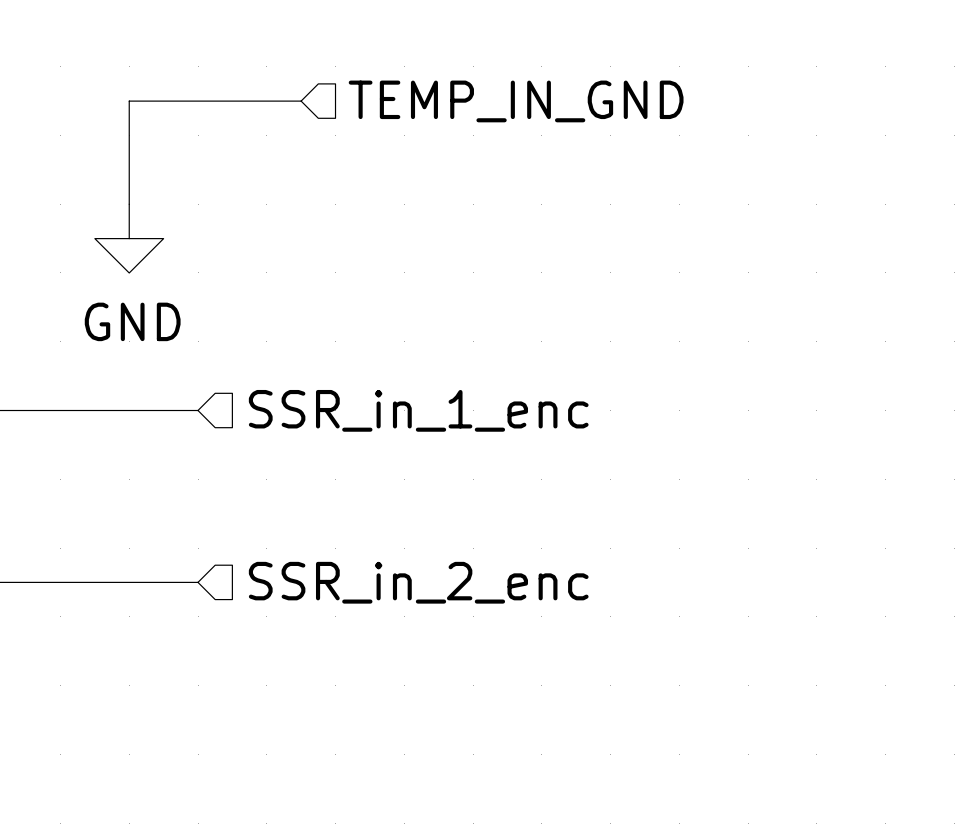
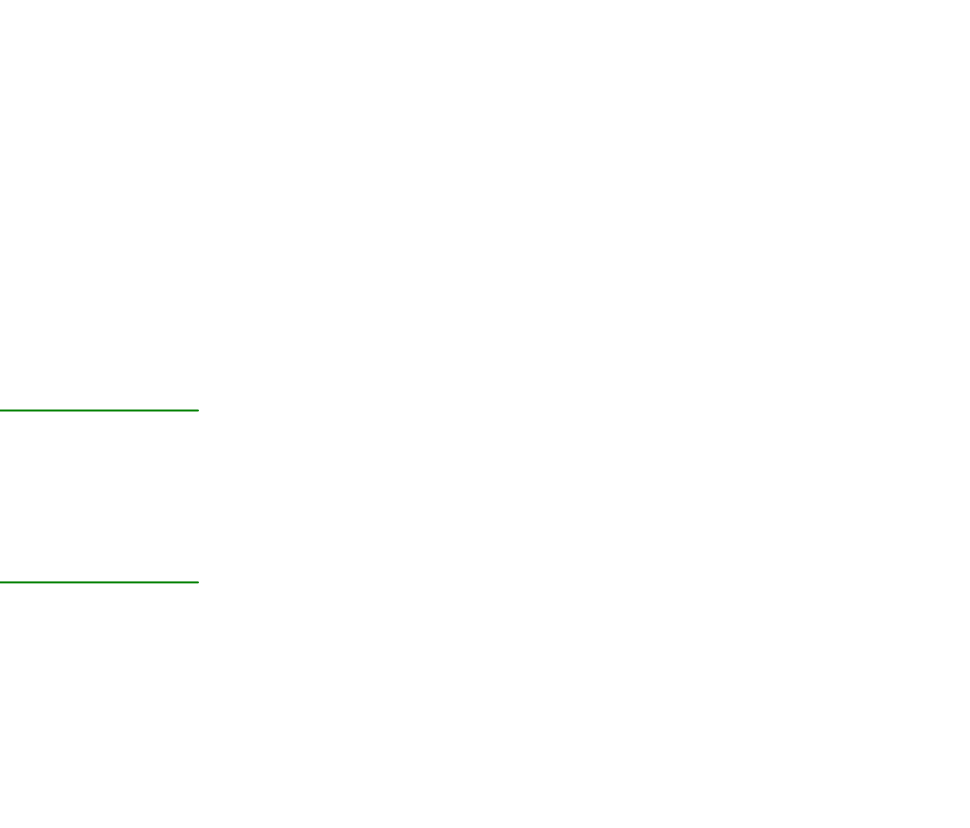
wire: (301, 101) (129, 101) (129, 204) -> none
hierarchical label: TEMP_IN_GND (516, 101) -> none
power symbol: GND (129, 238) -> none
hierarchical label: SSR_in_1_enc (418, 410) -> none
hierarchical label: SSR_in_2_enc (418, 582) -> none

